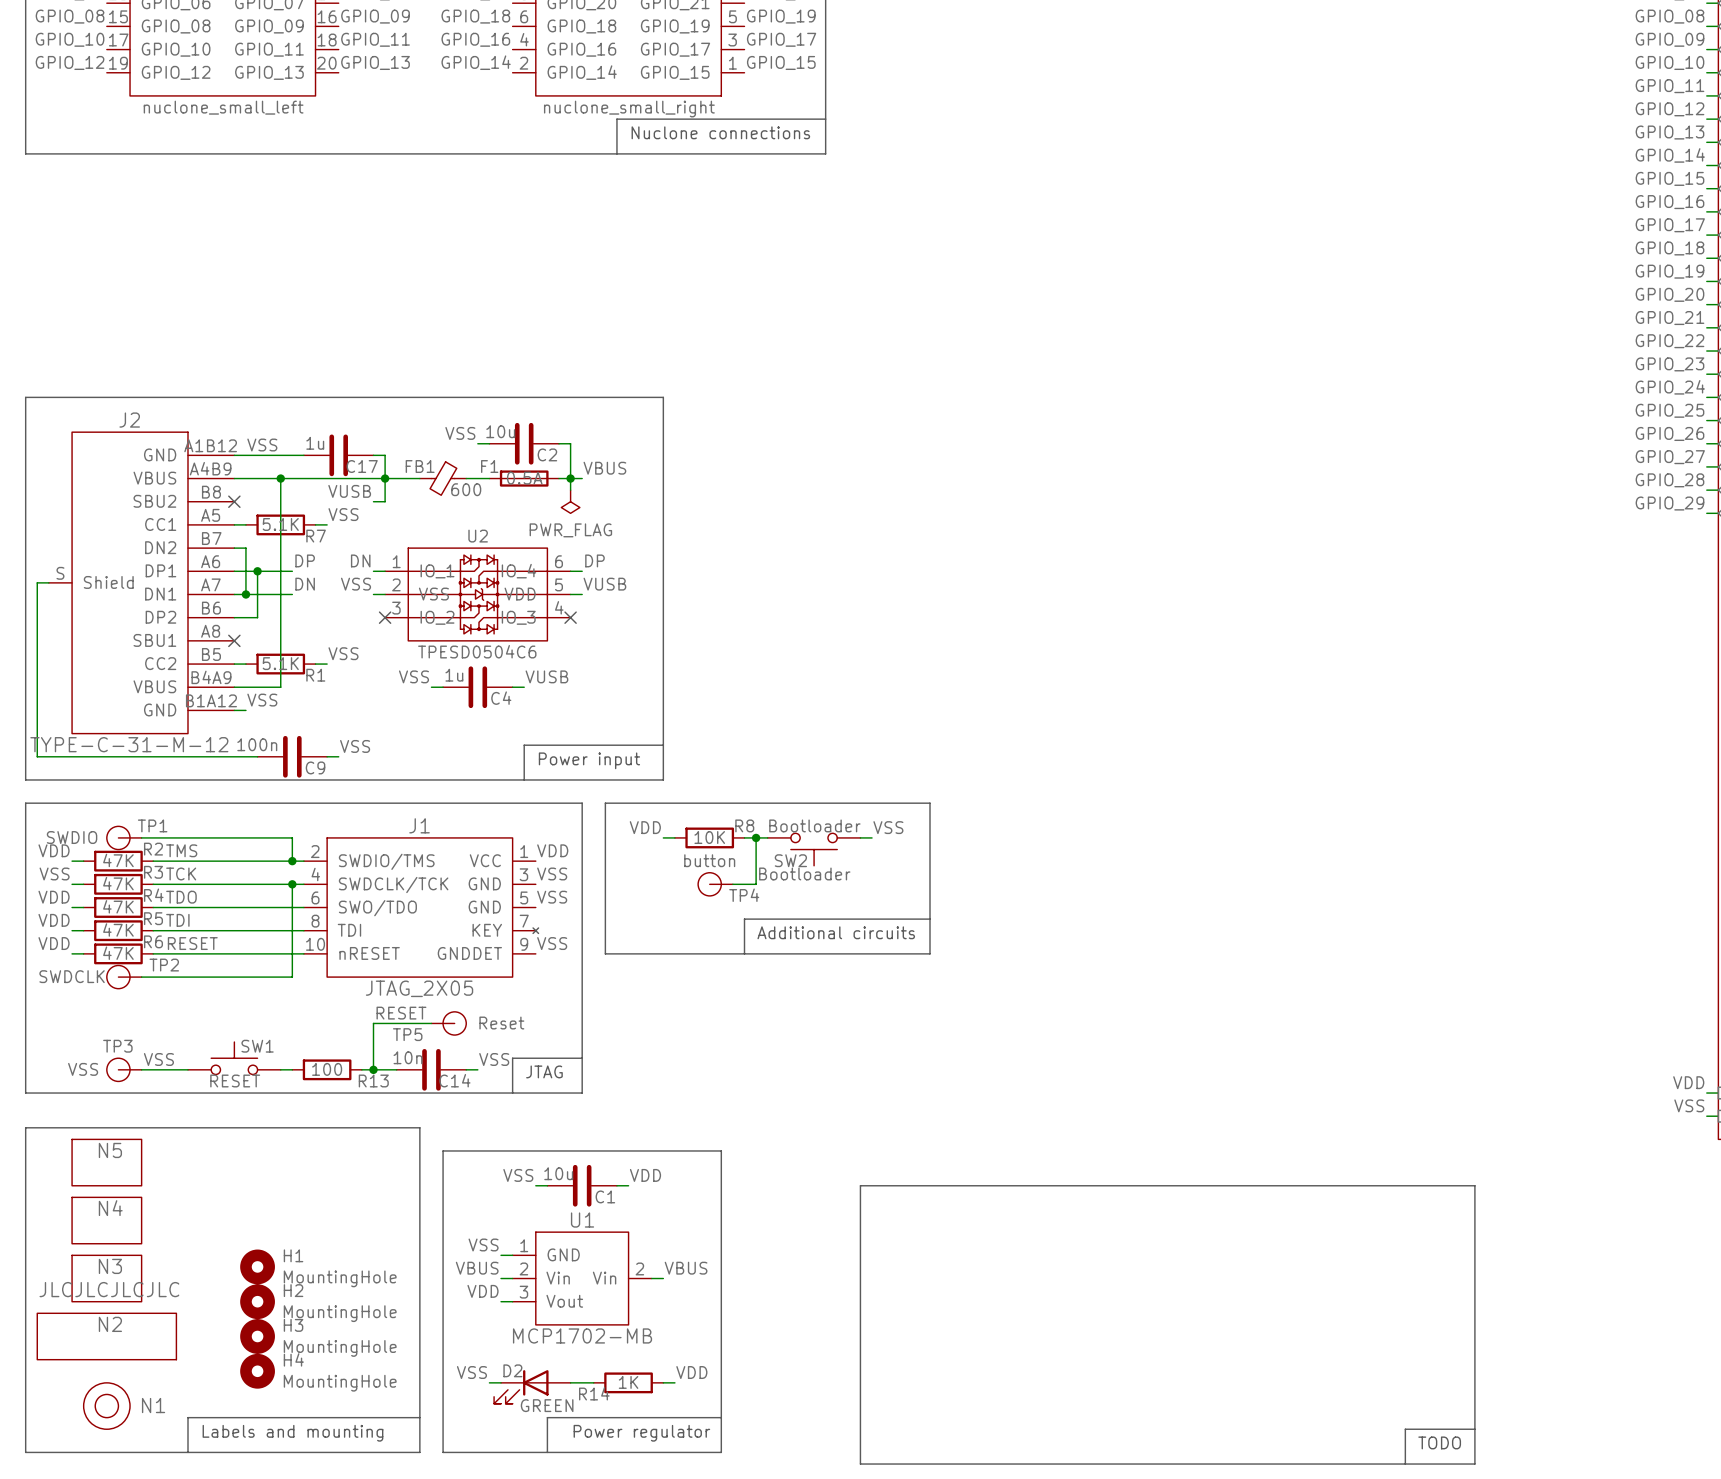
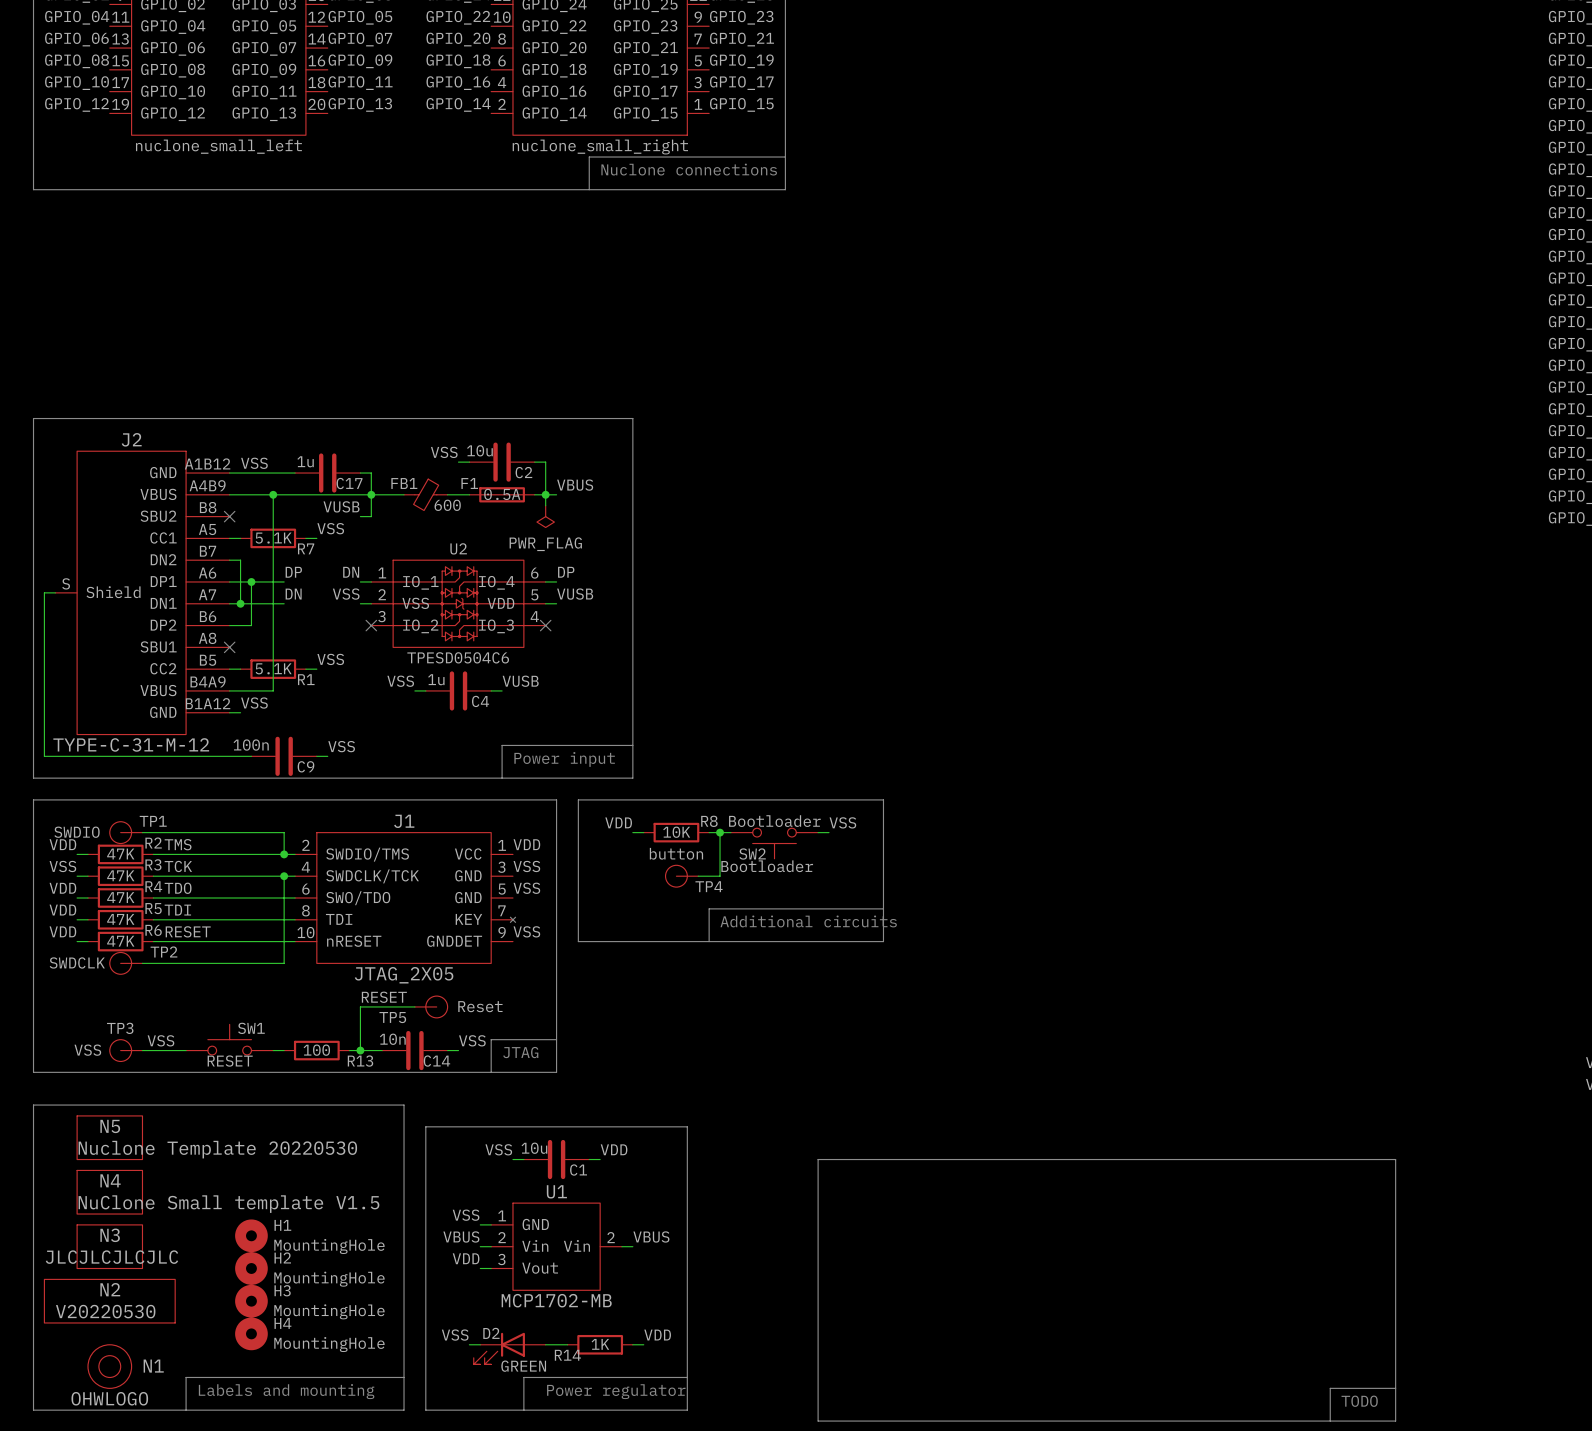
N5 value: none -> Nuclone Template 20220530 (217, 1149)
N4 value: none -> NuClone Small template V1.5 (228, 1204)
N2 value: none -> V20220530 (105, 1311)
N1 value: none -> OHWLOGO (109, 1398)

